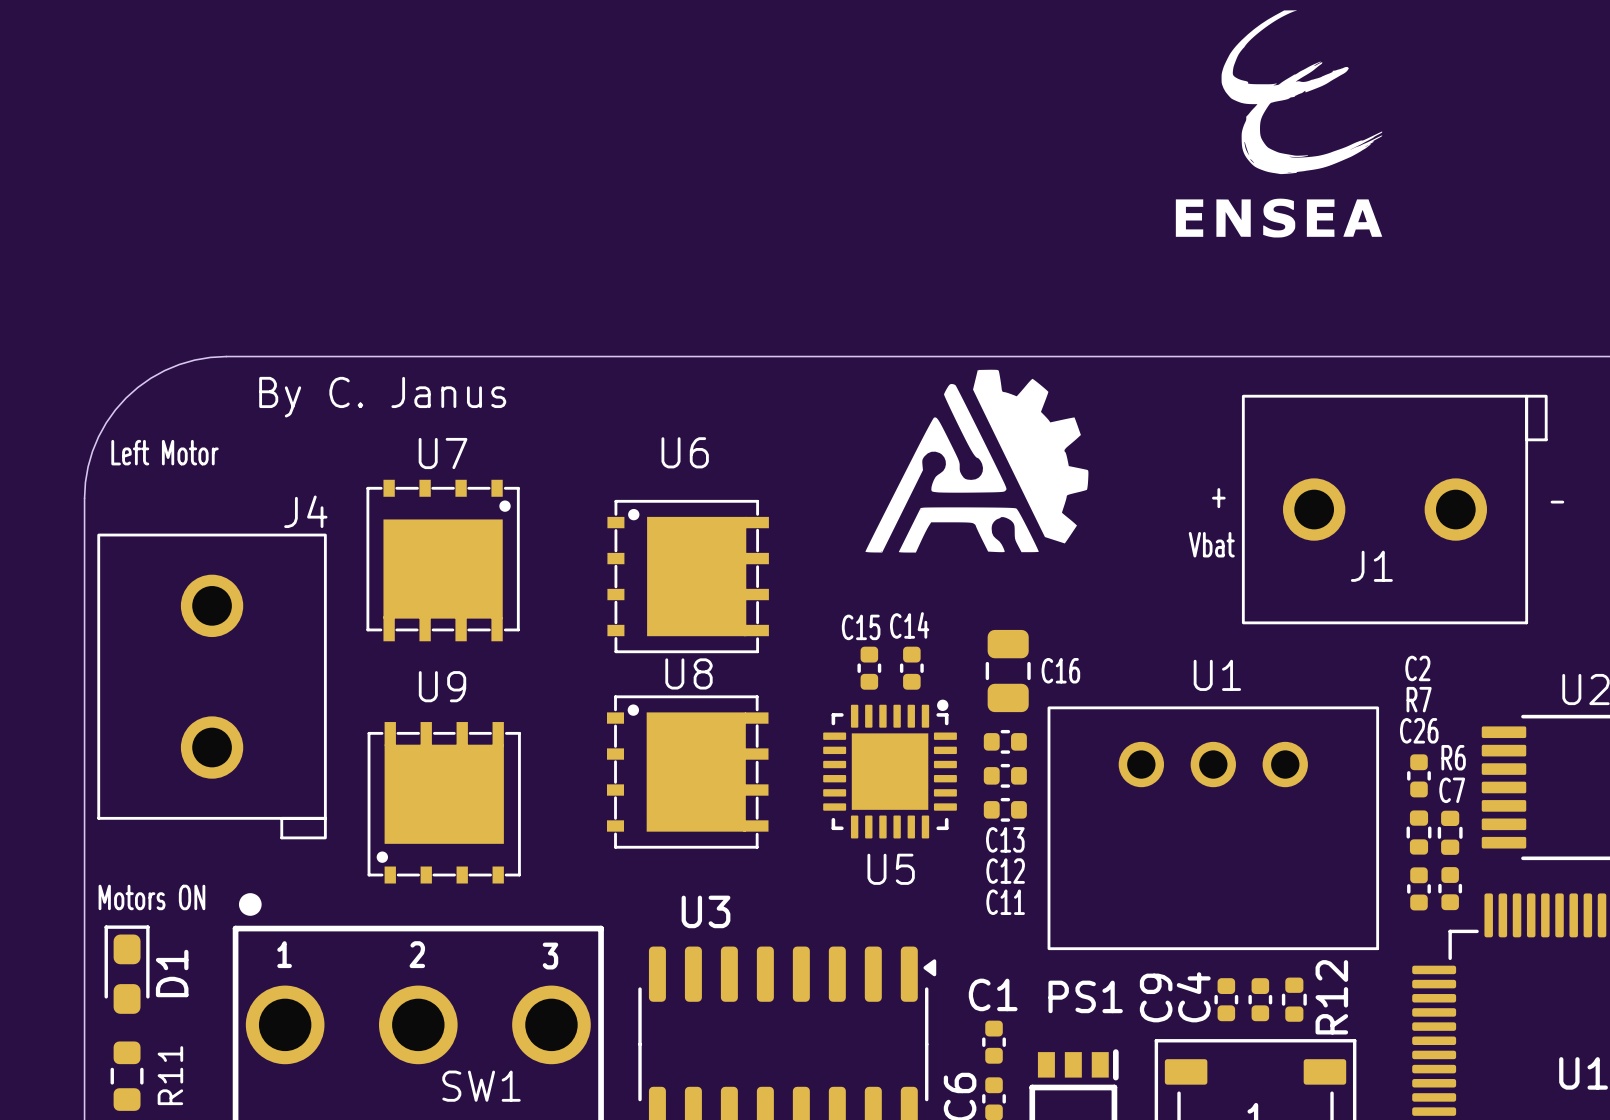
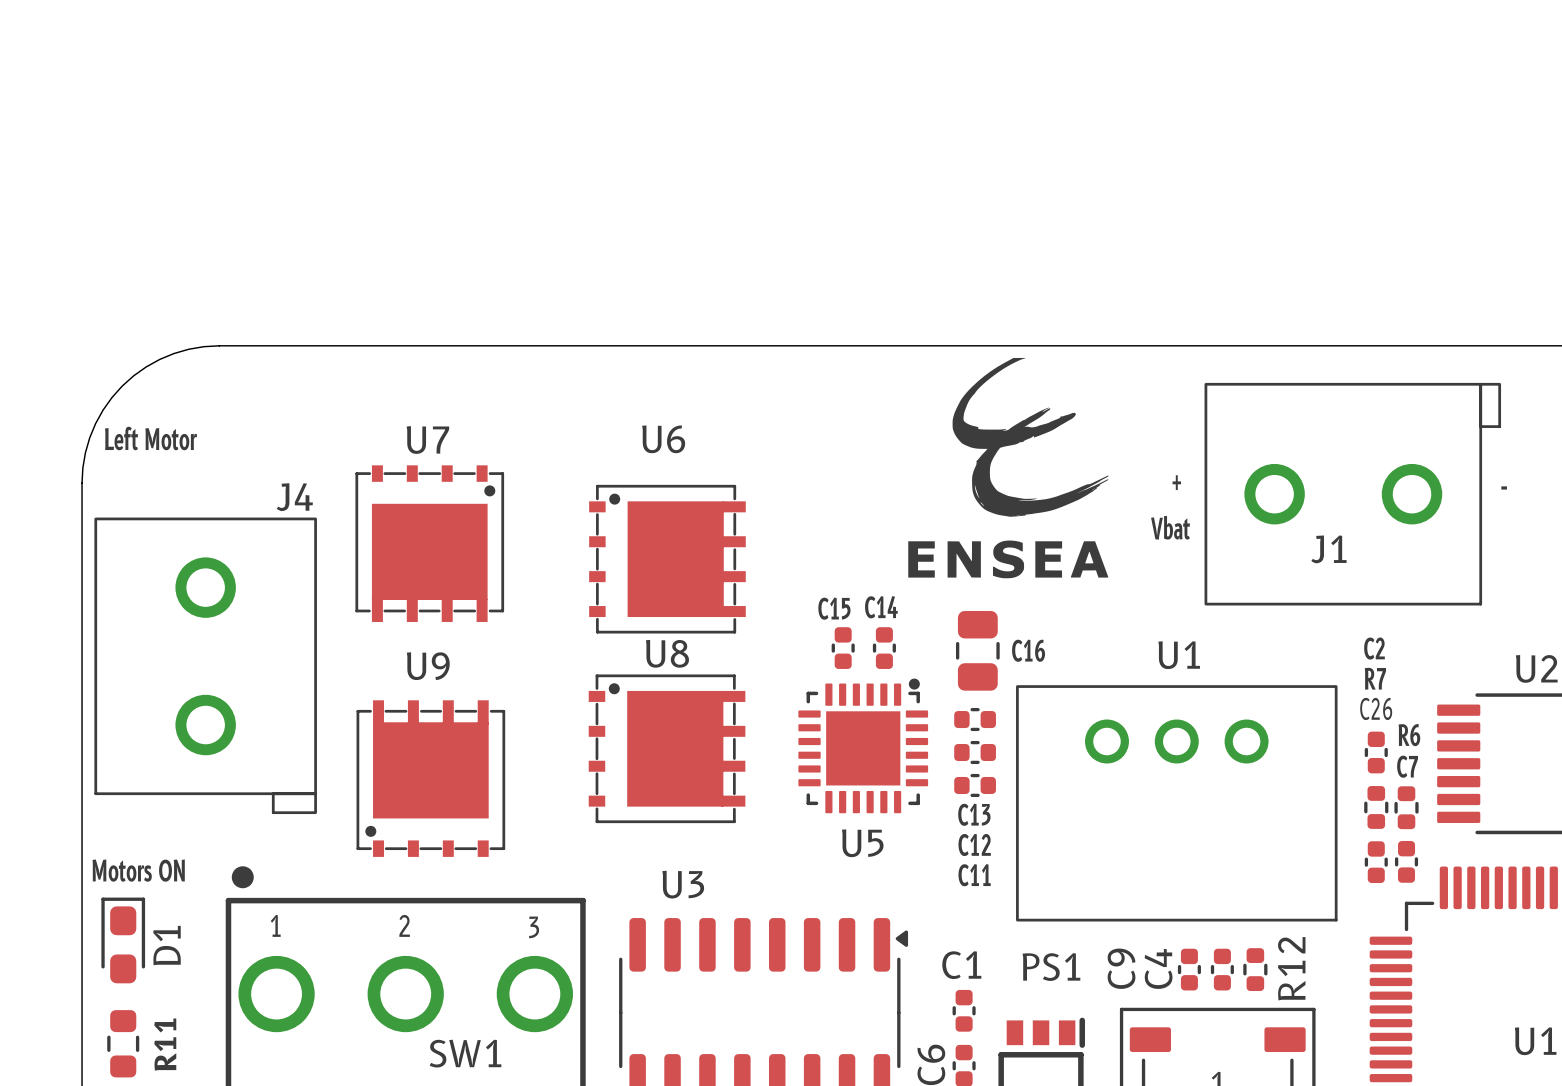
drawing position: (1279, 123) -> (1008, 468)
drawing: [865, 369, 1089, 553] -> none
text: By C. Janus (382, 397) -> none

